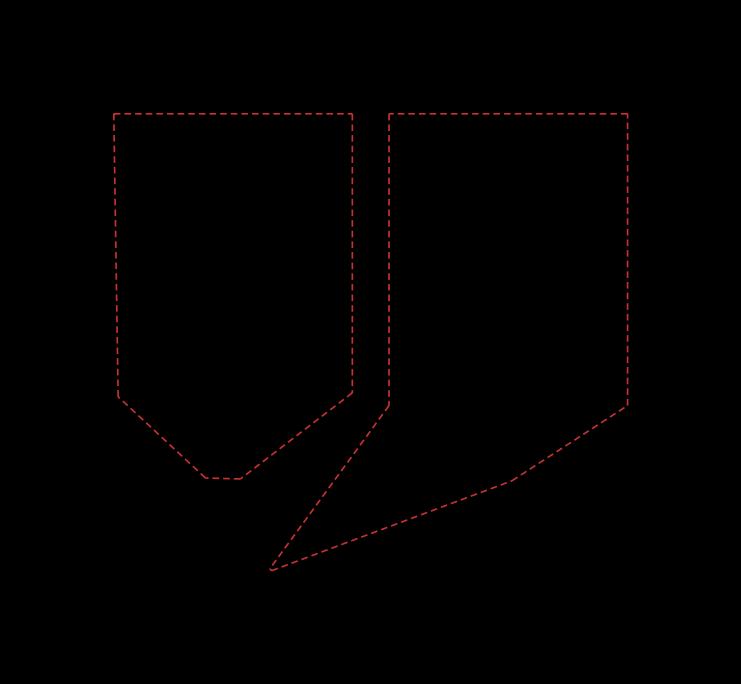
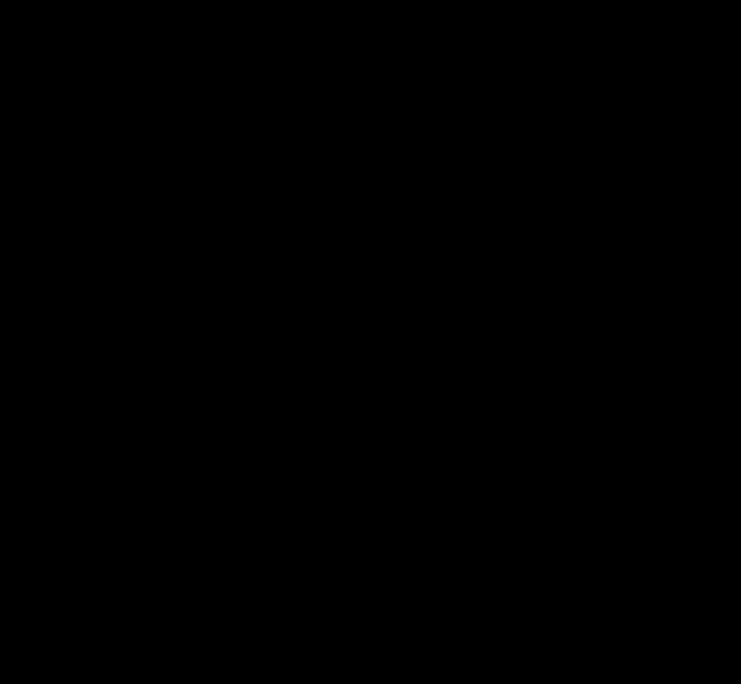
zone outline: (113, 113) (118, 396) (205, 478) (240, 478) (352, 392) (352, 113) (113, 113) -> none
zone outline: (389, 113) (627, 113) (627, 405) (511, 480) (271, 570) (269, 568) (389, 405) (389, 113) -> none

